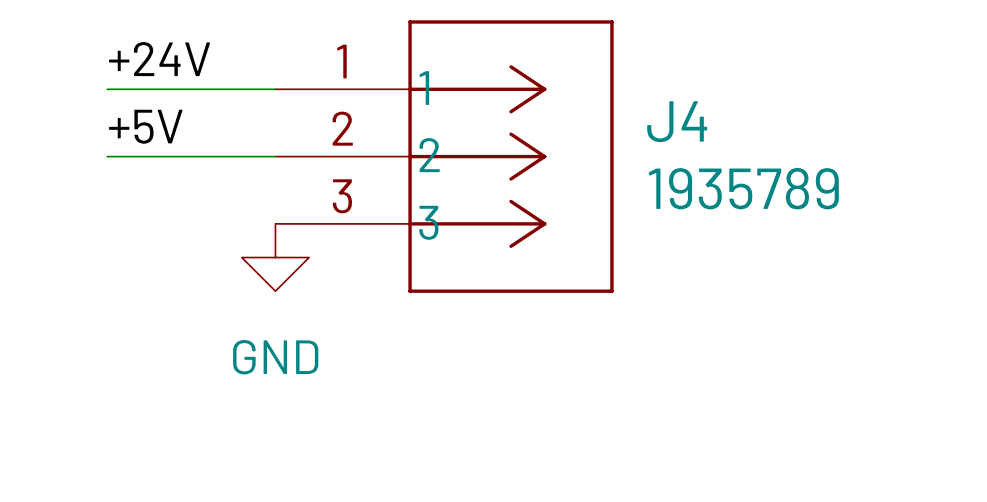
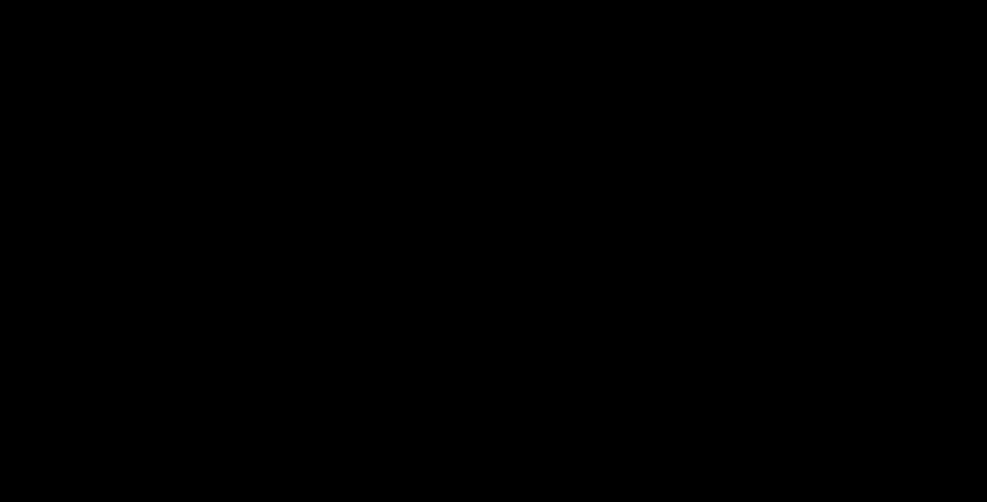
label: +24V (159, 59) -> none
wire: (107, 89) (275, 89) -> none
label: +5V (145, 126) -> none
wire: (107, 156) (275, 156) -> none
J4: 1935789 (444, 156) -> none
power symbol: GND (275, 257) -> none

